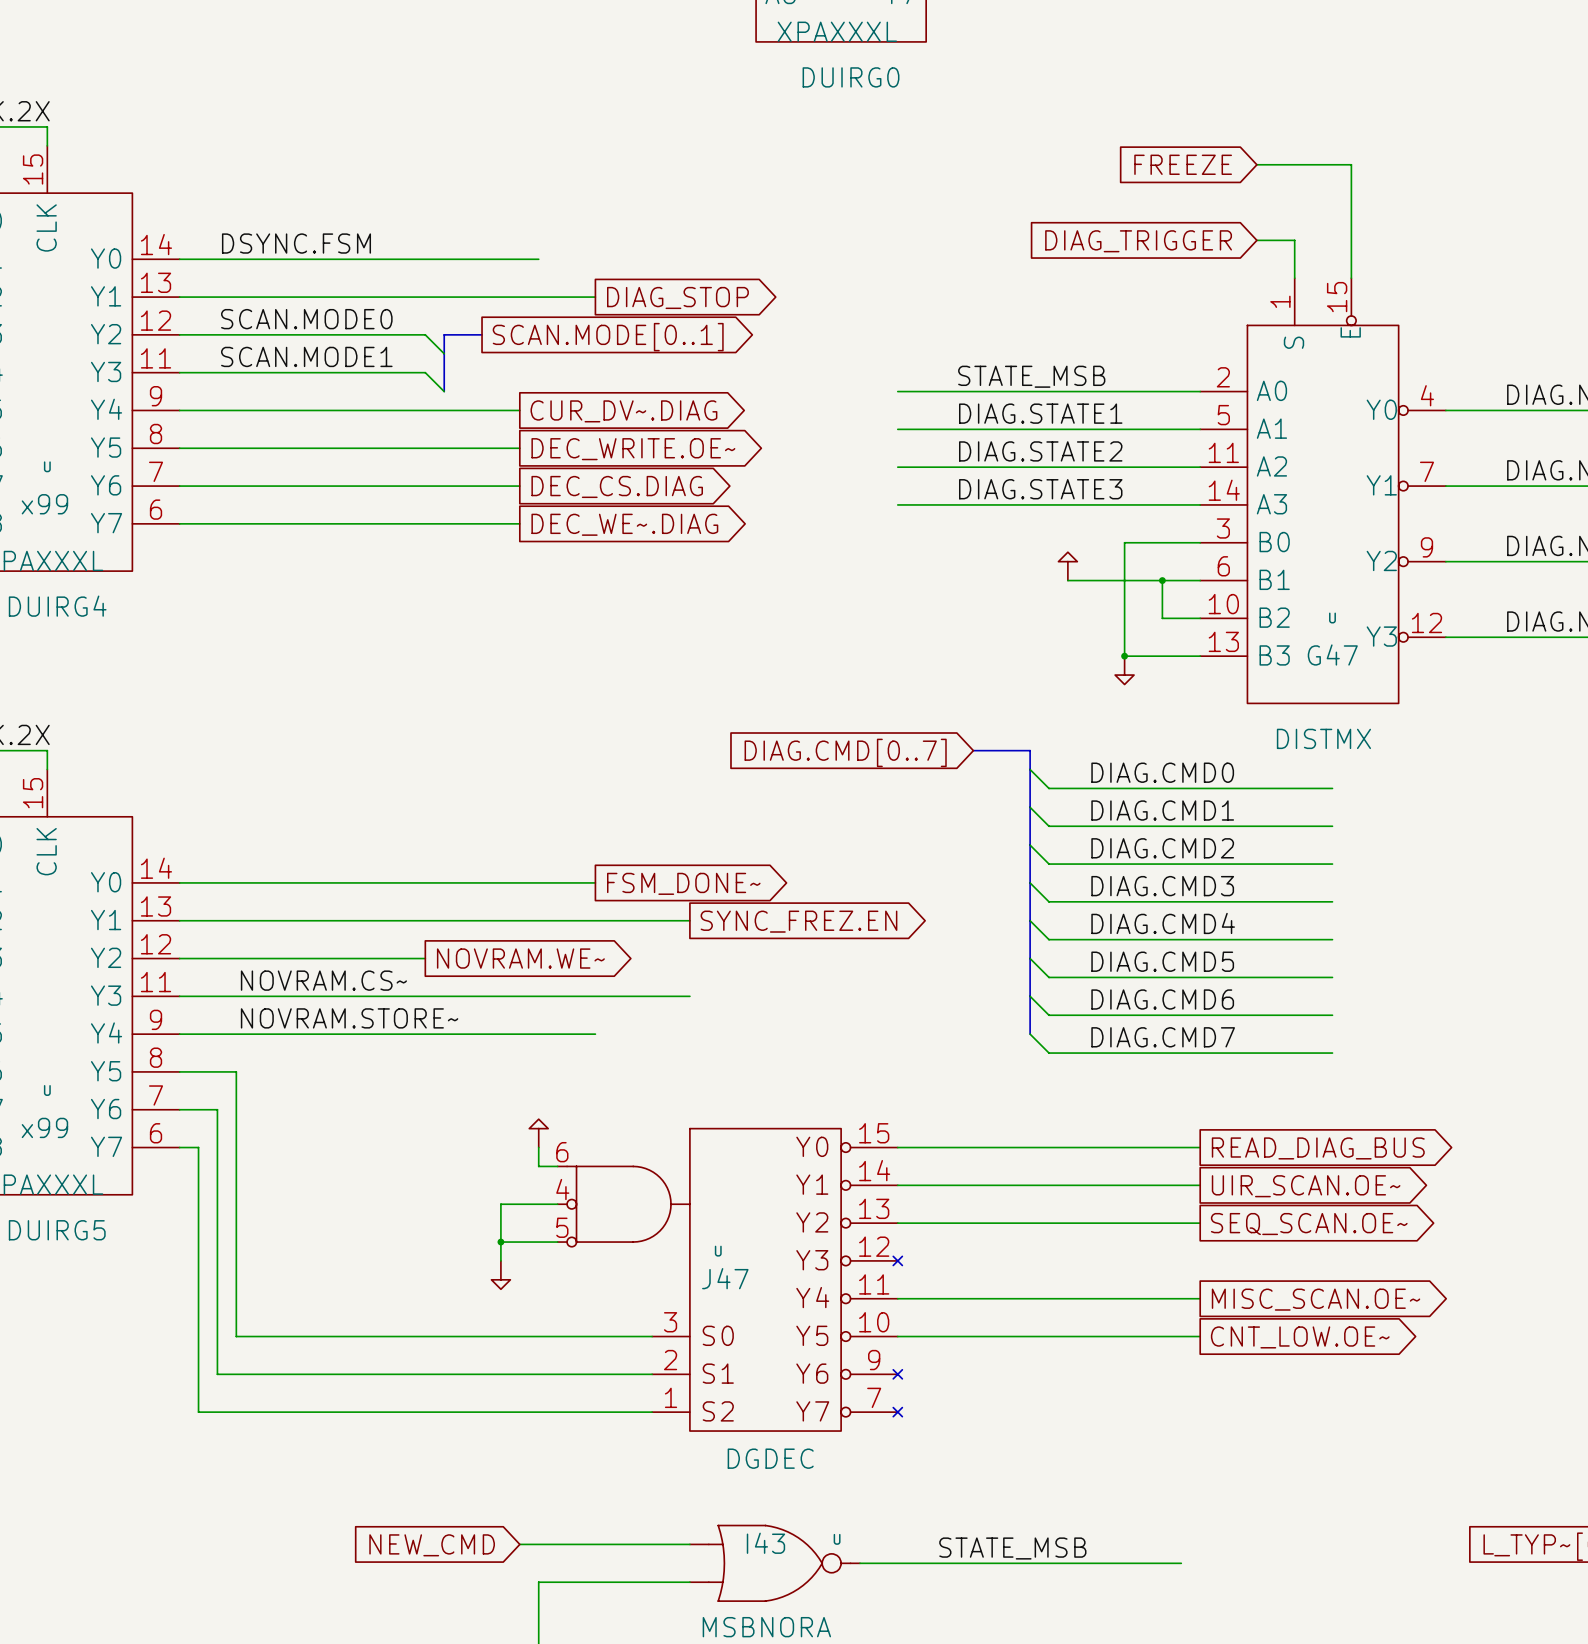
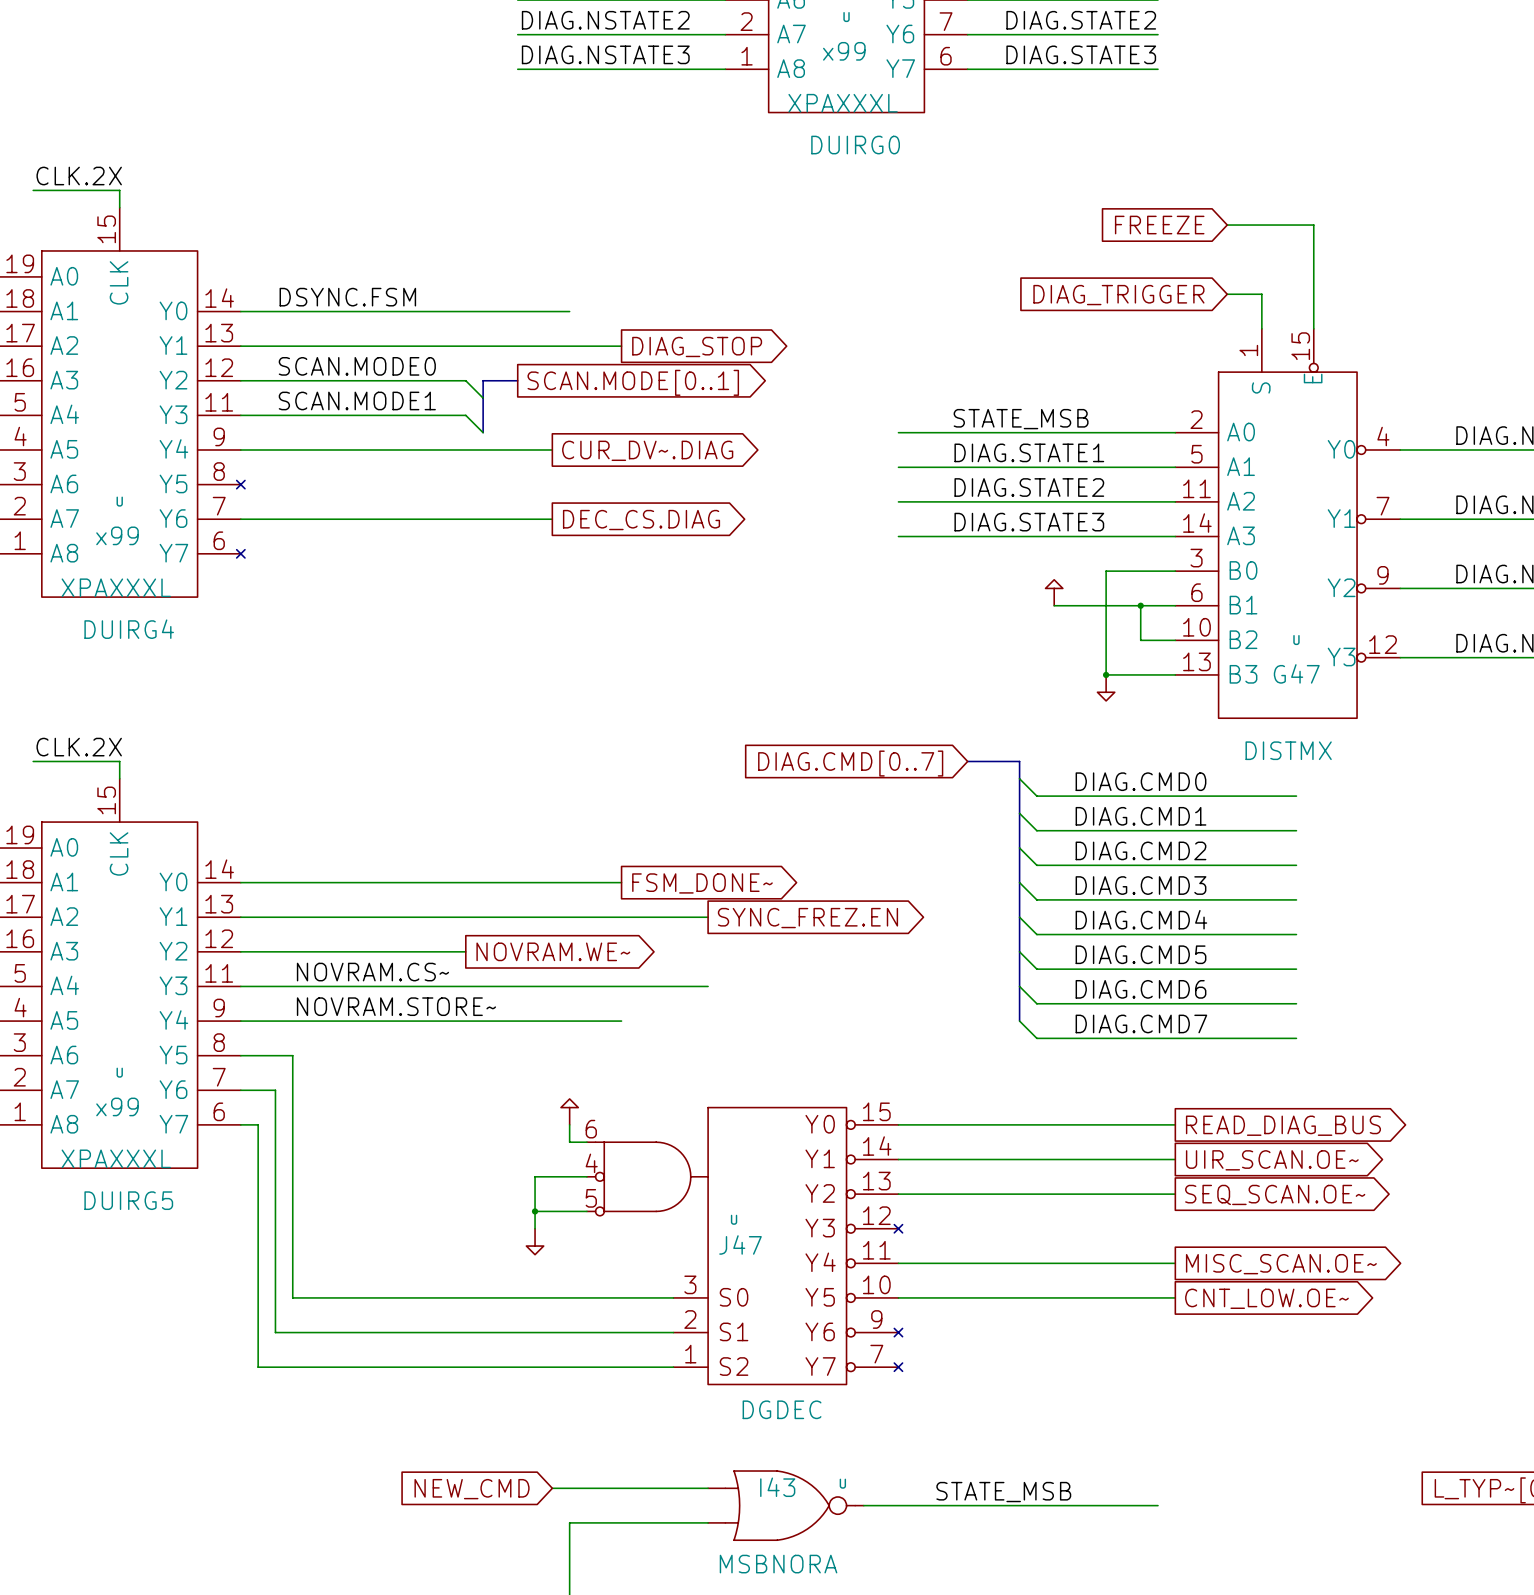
wire: (179, 448) (519, 448) -> none
no-connect mark: none -> (240, 484)
global label: DEC_WRITE.OE~ (633, 449) -> none
wire: (179, 523) (519, 523) -> none
no-connect mark: none -> (240, 553)
global label: DEC_WE~.DIAG (624, 524) -> none

